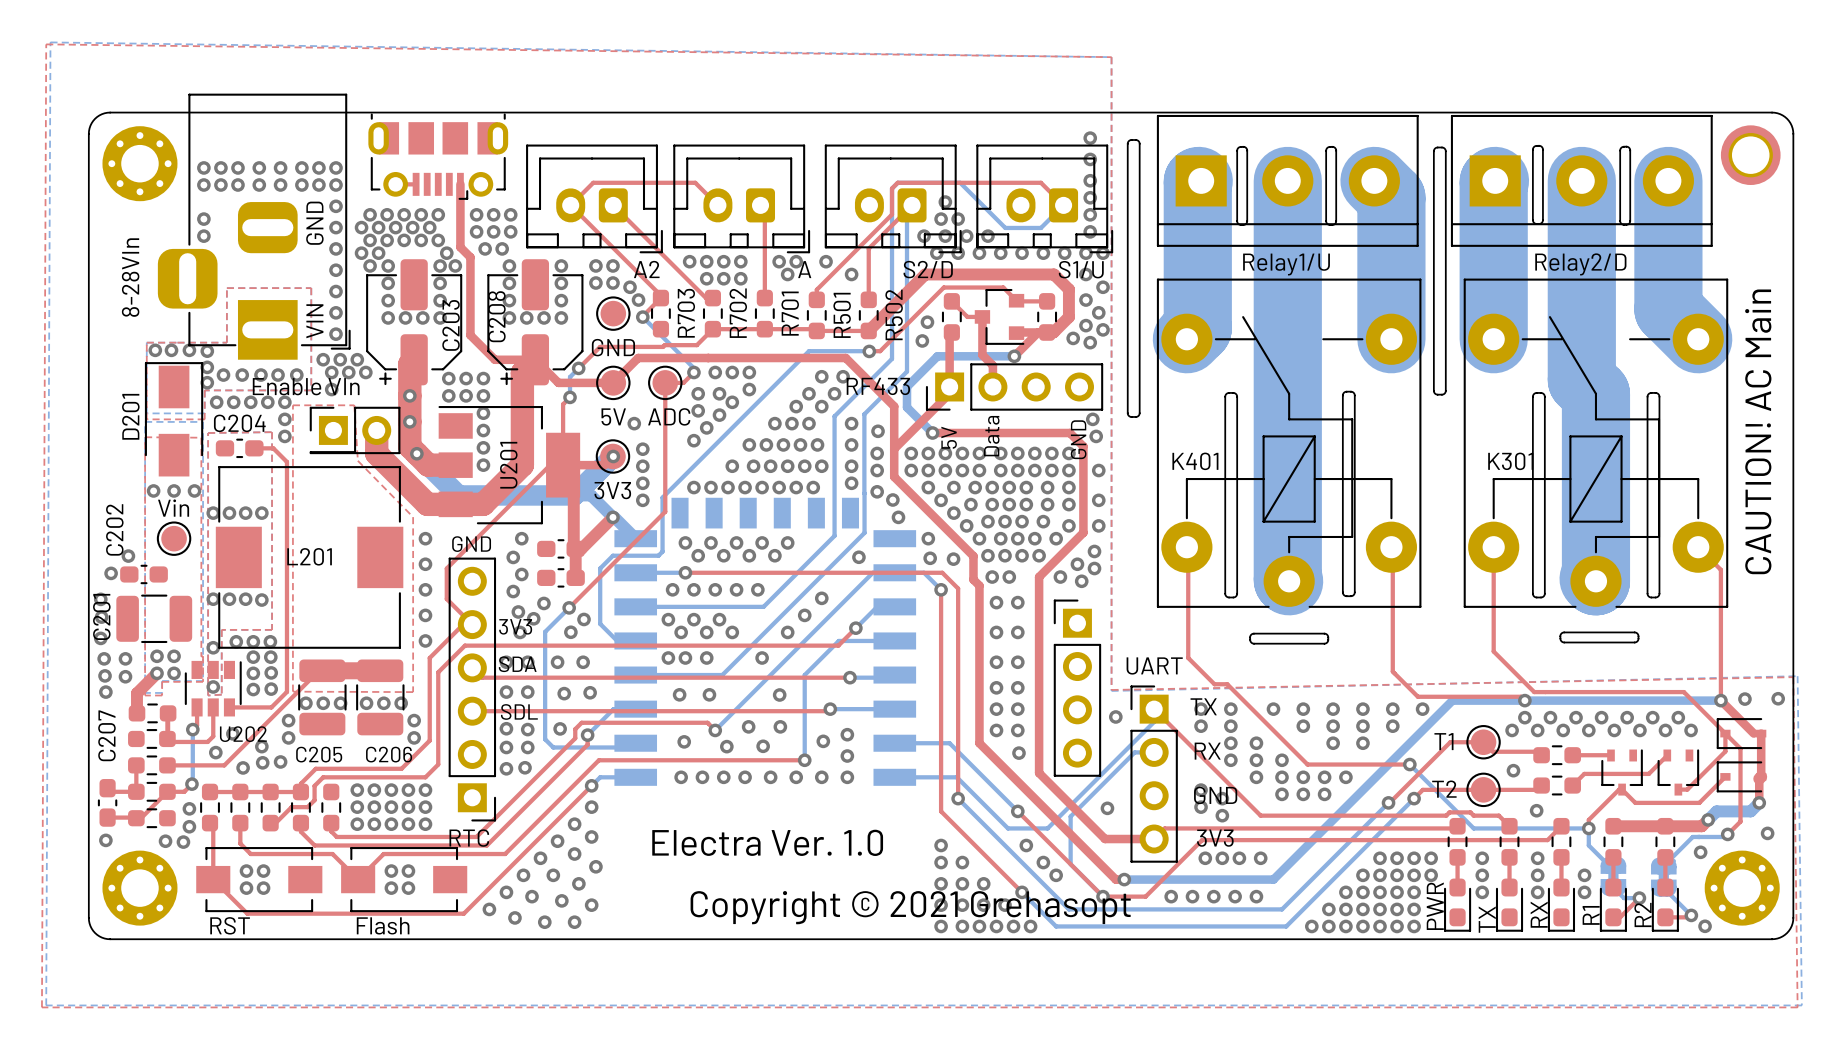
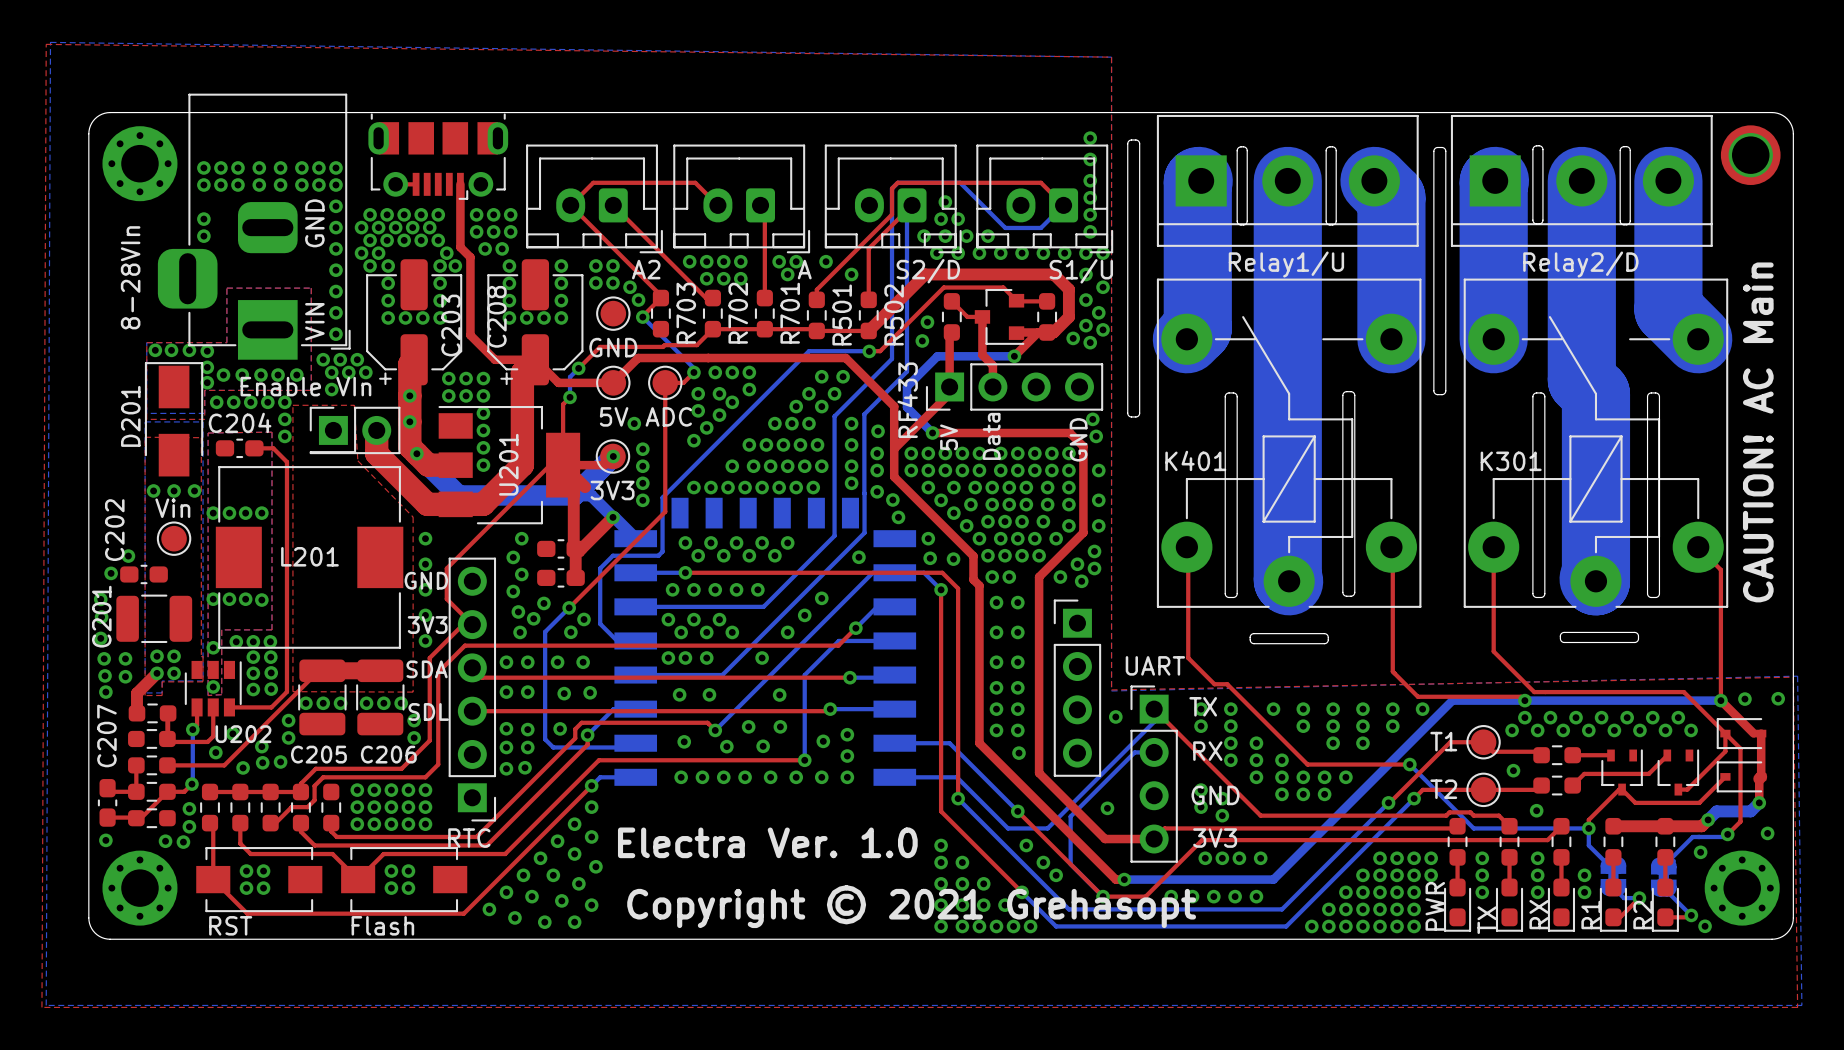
part value rotation: 0° (878, 386) -> 90° counterclockwise (907, 400)
top track: none -> (573, 475) (585, 487)
text position: GND (471, 544) -> GND (426, 580)
text position: 3V3 (515, 626) -> 3V3 (427, 625)
text position: SDA (517, 664) -> SDA (427, 669)
text position: SDL (519, 711) -> SDL (428, 711)

